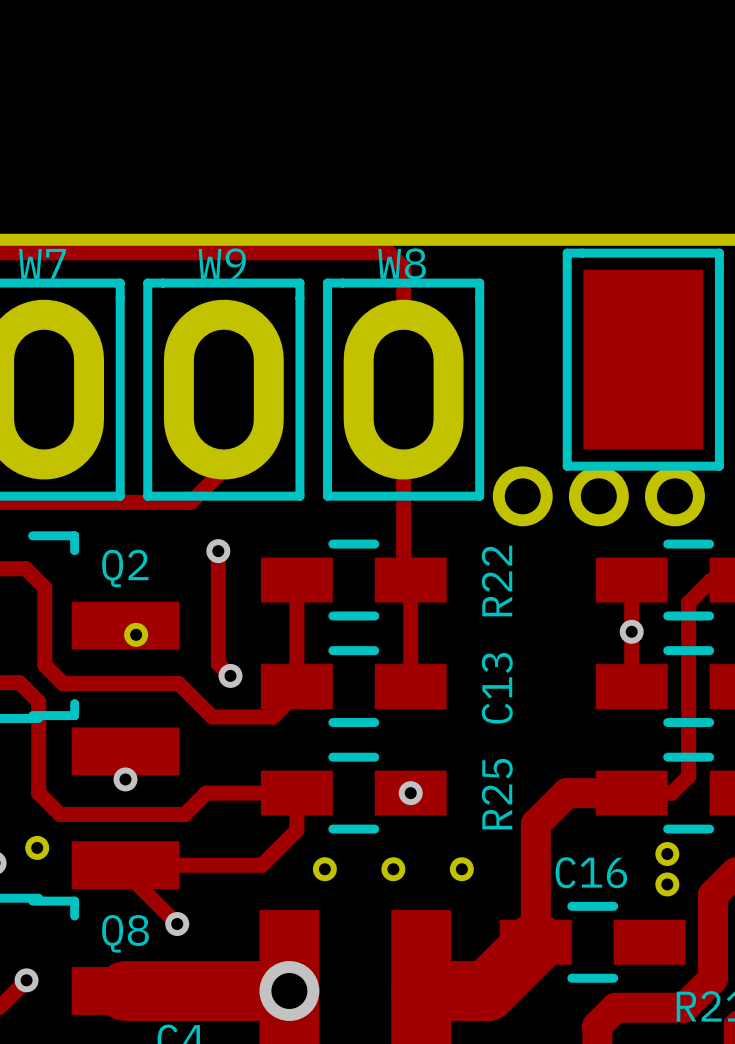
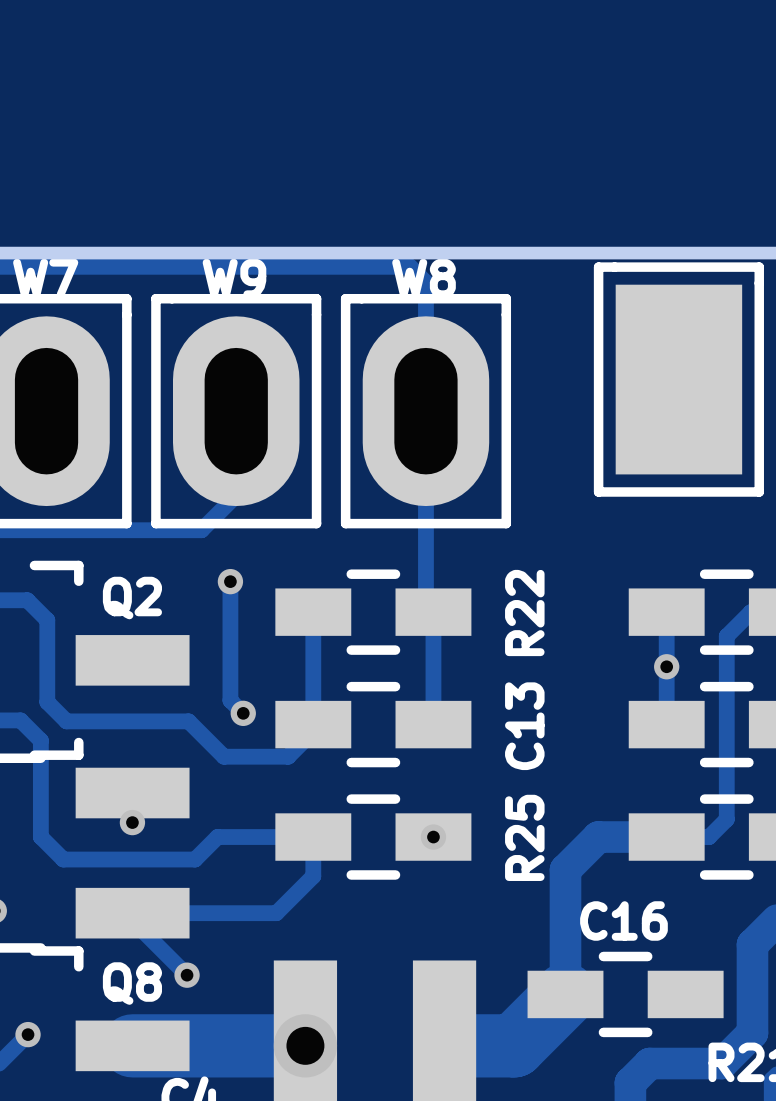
part: (522, 496) -> none
part: (598, 496) -> none
part: (674, 496) -> none
part: (136, 634) -> none
part: (37, 847) -> none
part: (667, 854) -> none
part: (324, 869) -> none
part: (393, 869) -> none
part: (461, 869) -> none
part: (667, 884) -> none

